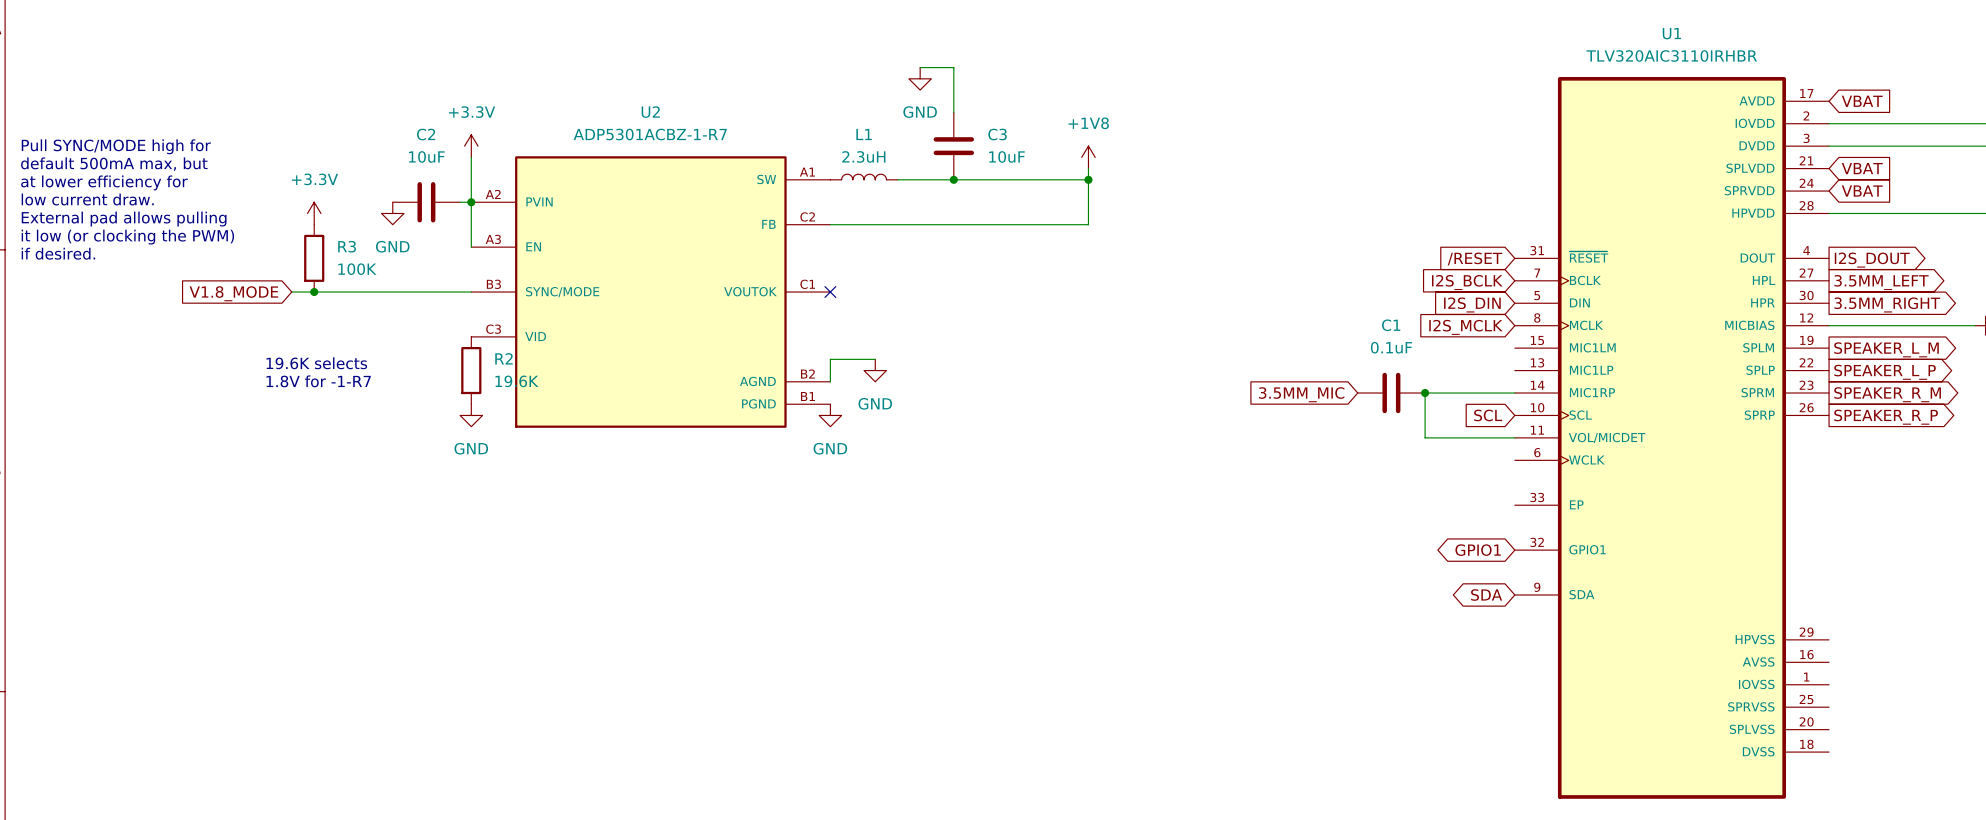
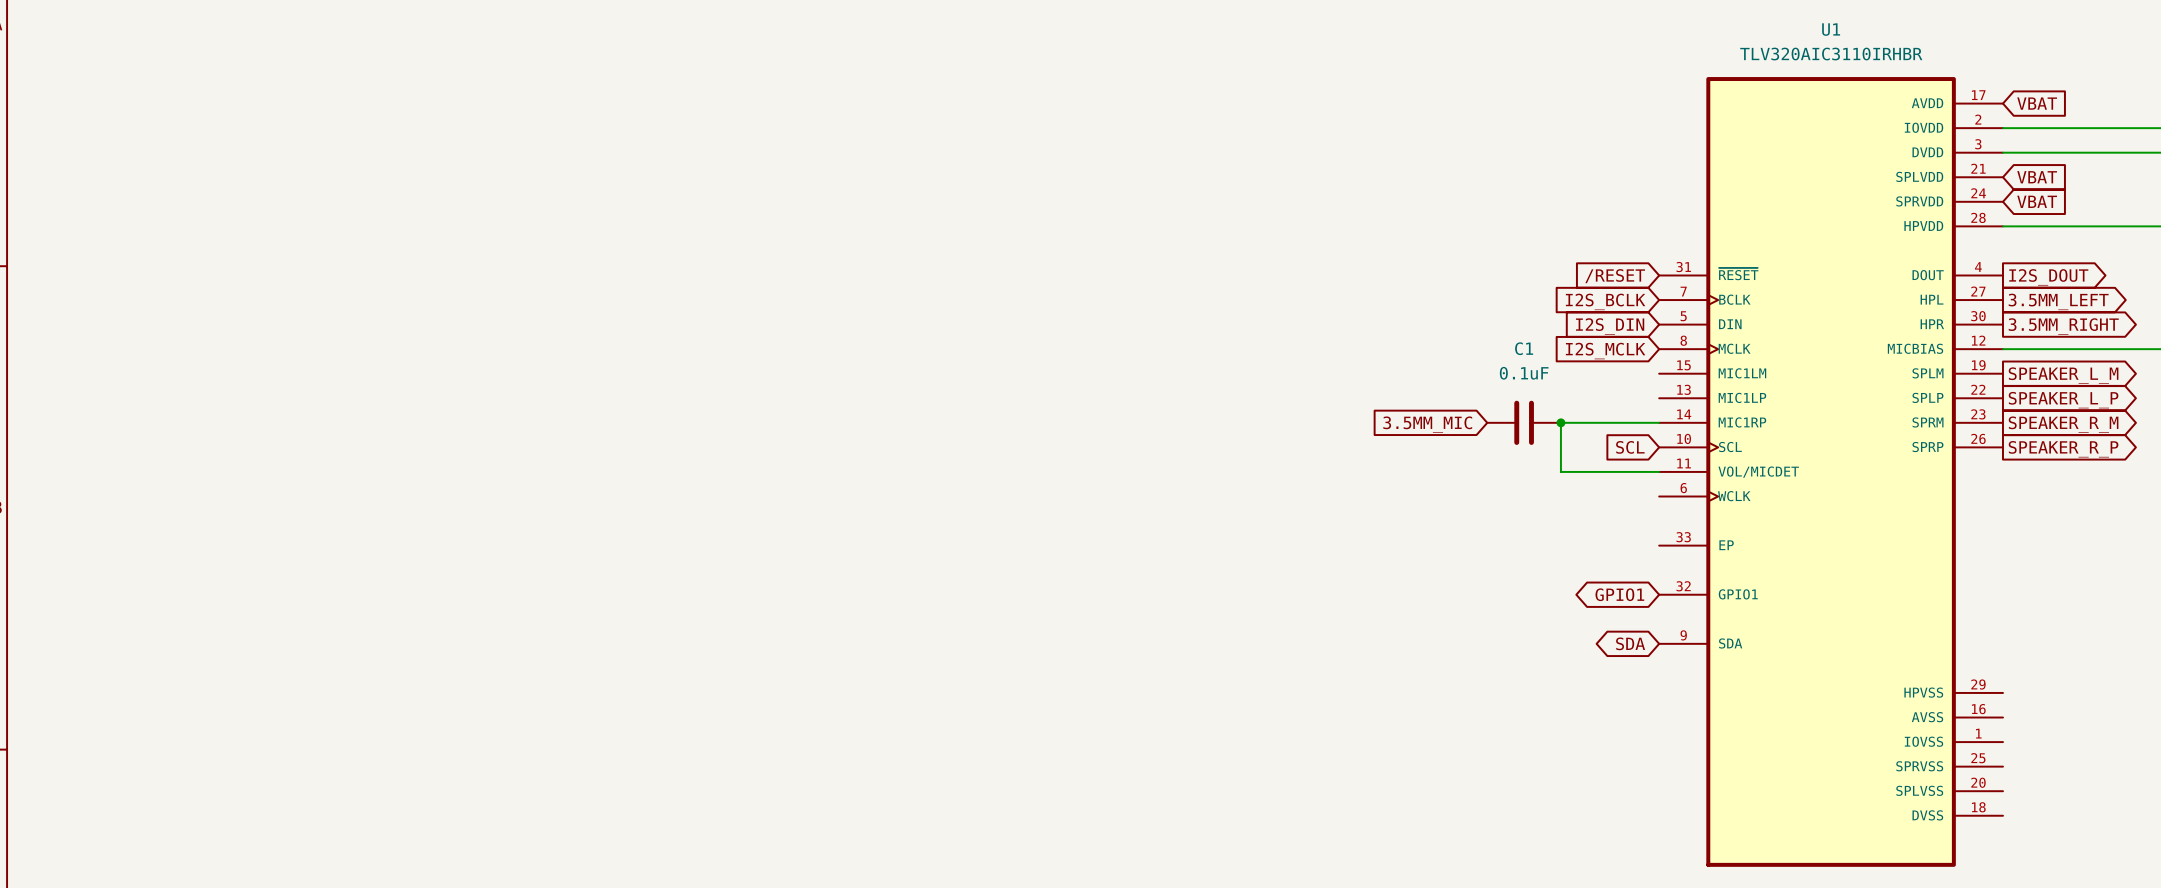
wire: (920, 67) (953, 67) (953, 112) -> none
power symbol: GND (920, 78) -> none
text: Pull SYNC/MODE high for (116, 146) -> none
power symbol: +3.3V (471, 146) -> none
C3: 10uF (953, 146) -> none
wire: (471, 157) (471, 247) -> none
power symbol: +1V8 (1088, 157) -> none
text: default 500mA max, but (114, 164) -> none
wire: (1088, 168) (1088, 224) (830, 224) -> none
L1: 2.3uH (864, 177) -> none
wire: (897, 179) (1088, 179) -> none
junction: (953, 179) -> none
junction: (1088, 179) -> none
text: at lower efficiency for (104, 182) -> none
text: low current draw. (87, 199) -> none
C2: 10uF (426, 202) -> none
wire: (460, 202) (471, 202) -> none
junction: (471, 202) -> none
power symbol: +3.3V (314, 213) -> none
power symbol: GND (392, 213) -> none
text: External pad allows pulling (124, 219) -> none
text: it low (or clocking the PWM) (127, 237) -> none
text: if desired. (58, 253) -> none
R3: 100K (314, 258) -> none
wire: (291, 292) (471, 292) -> none
junction: (314, 292) -> none
U2: ADP5301ACBZ-1-R7 (650, 292) -> none
no-connect mark: (830, 292) -> none
global label: V1.8_MODE (233, 293) -> none
wire: (875, 359) (830, 359) (830, 381) -> none
text: 19.6K selects (316, 363) -> none
R2: 19.6K (471, 370) -> none
power symbol: GND (875, 370) -> none
text: 1.8V for -1-R7 (318, 381) -> none
power symbol: GND (471, 415) -> none
power symbol: GND (830, 415) -> none

